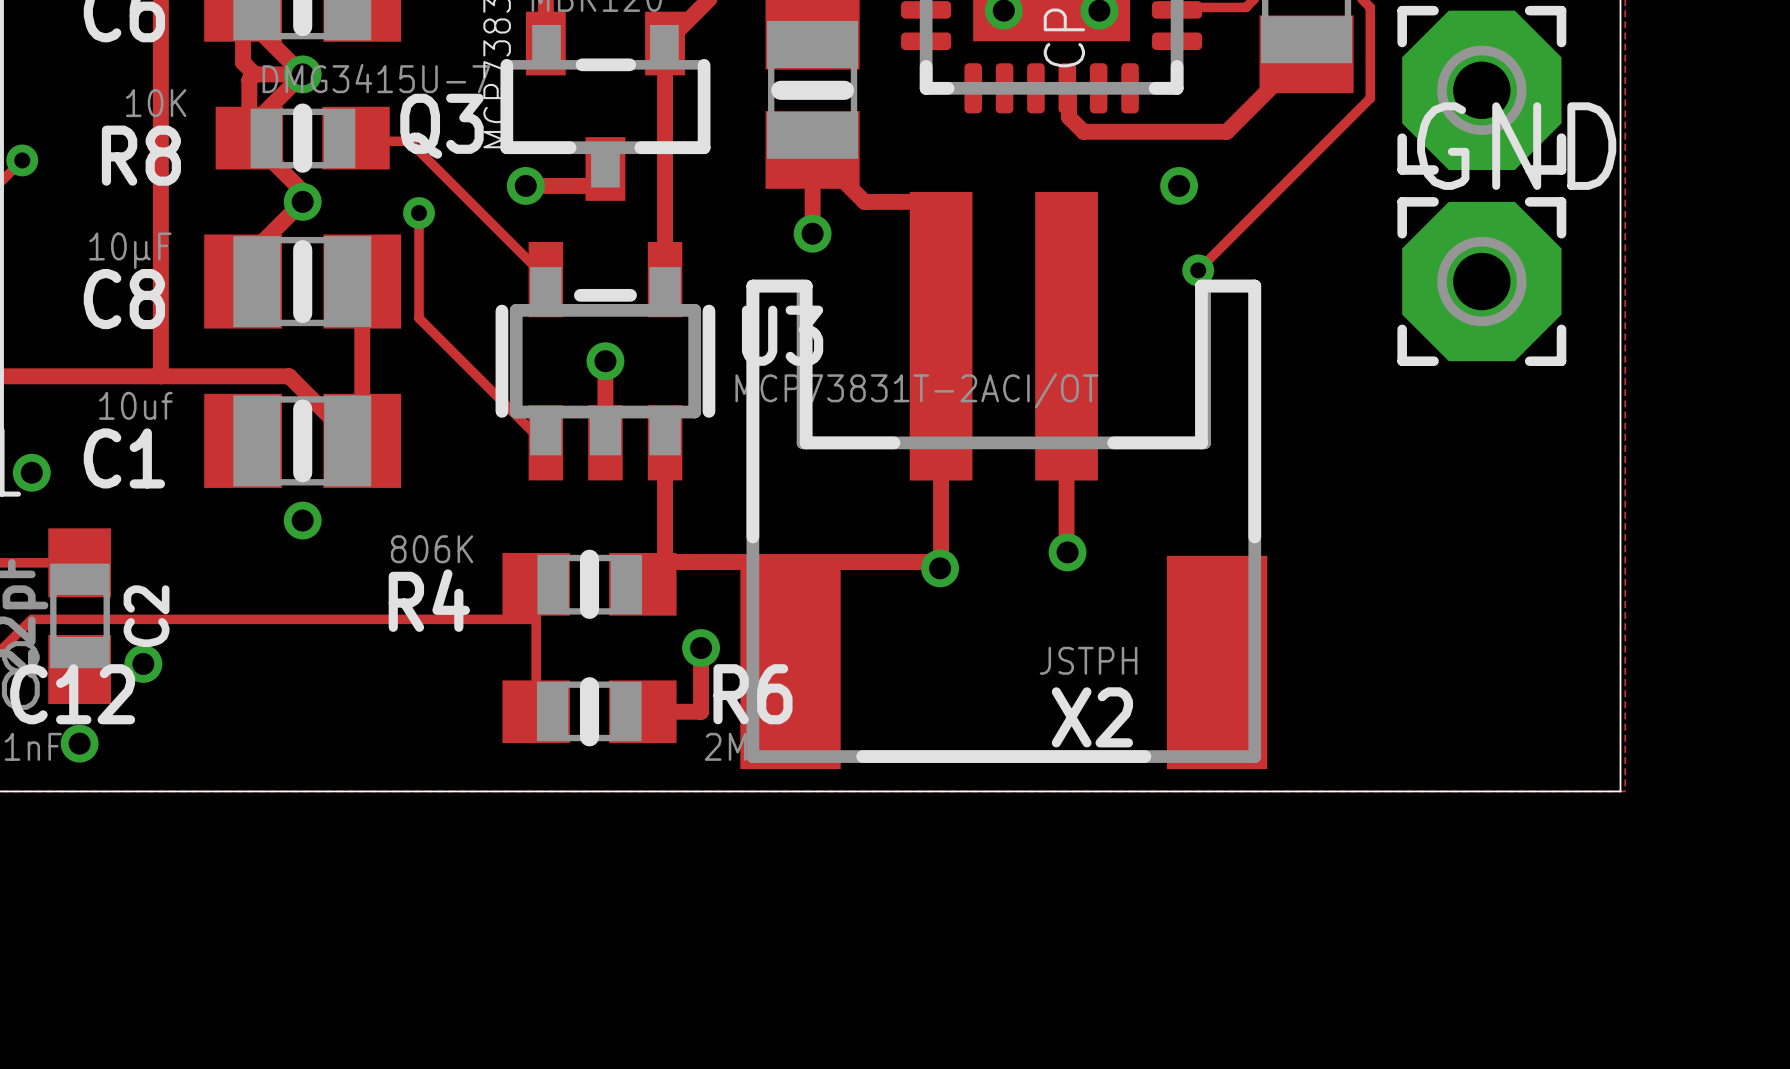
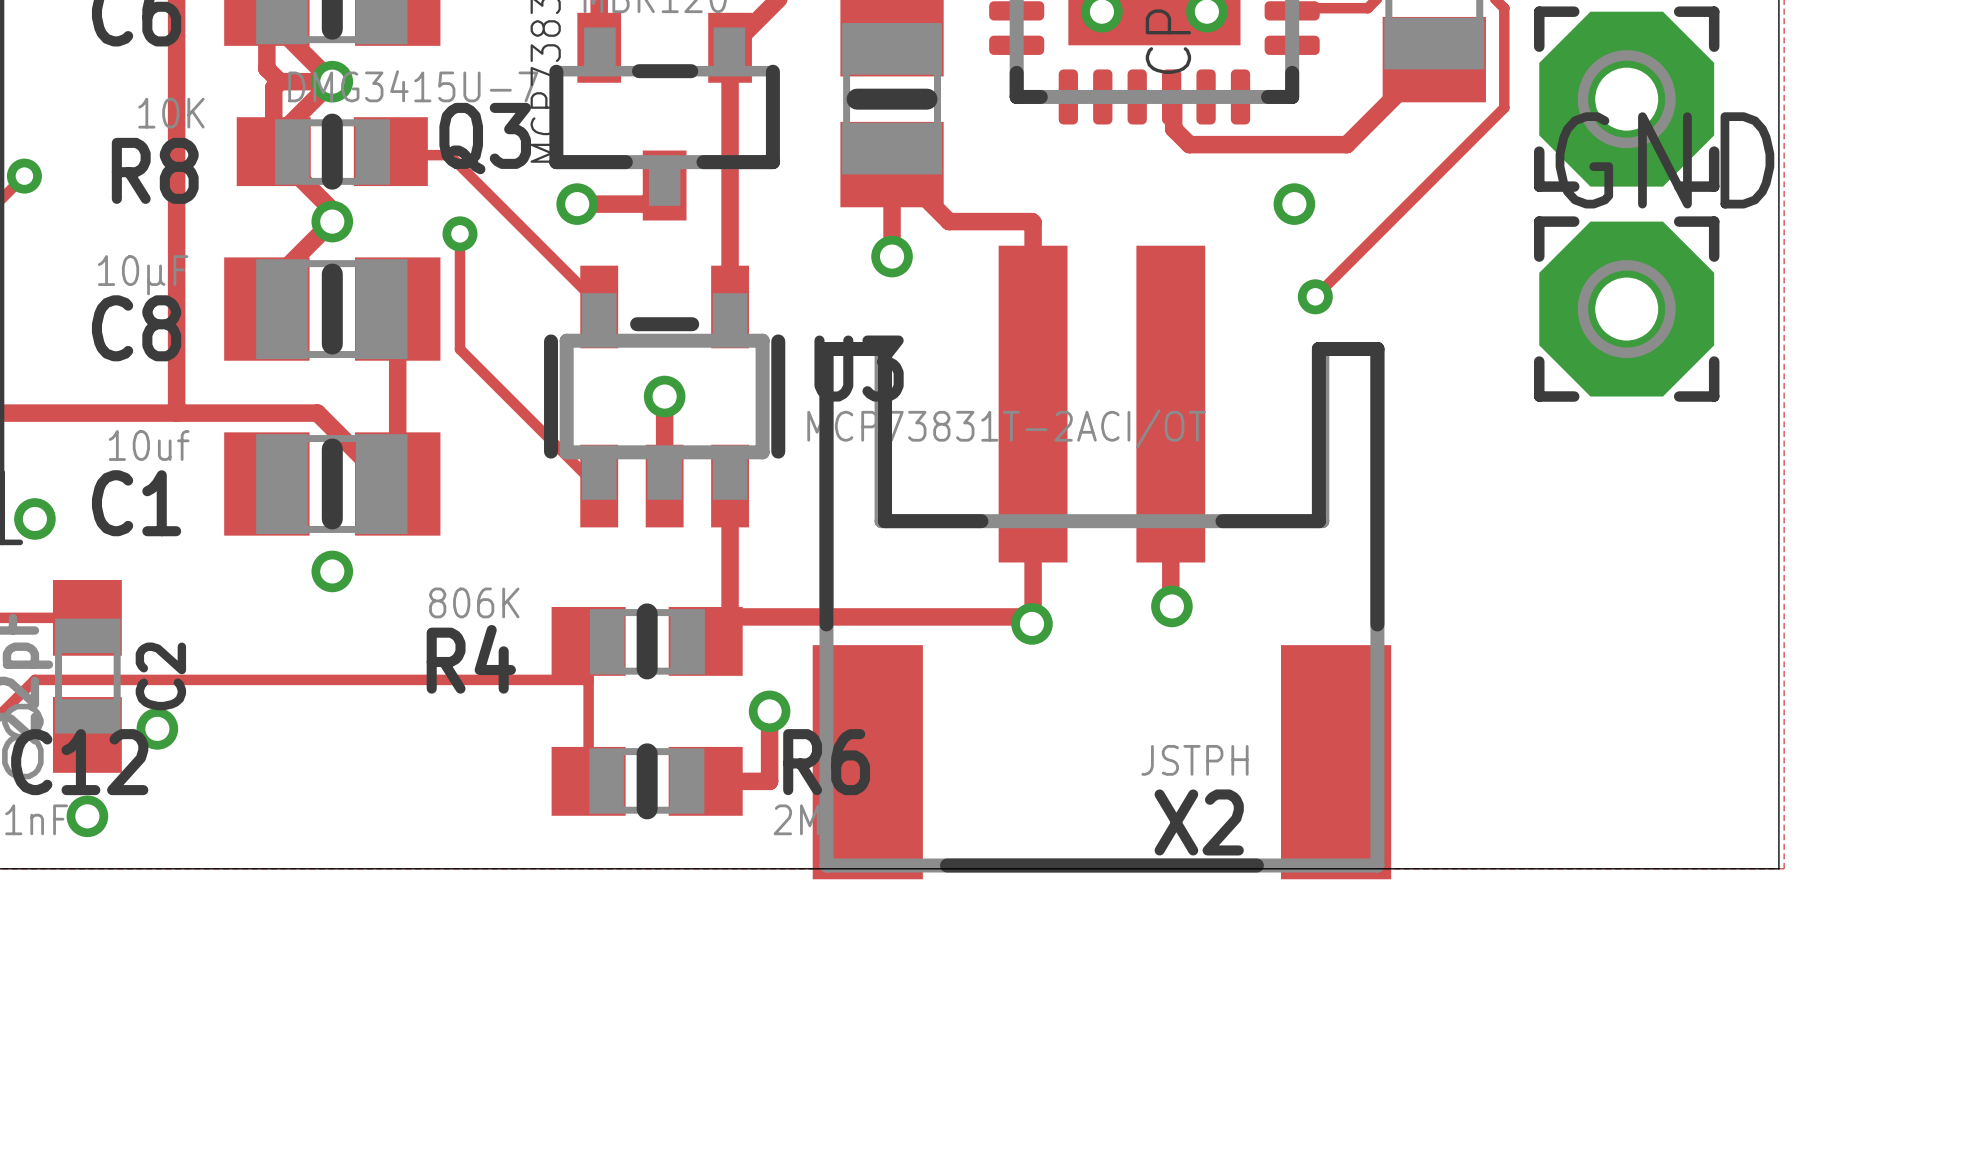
X2 position: (1003, 480) -> (1101, 562)

